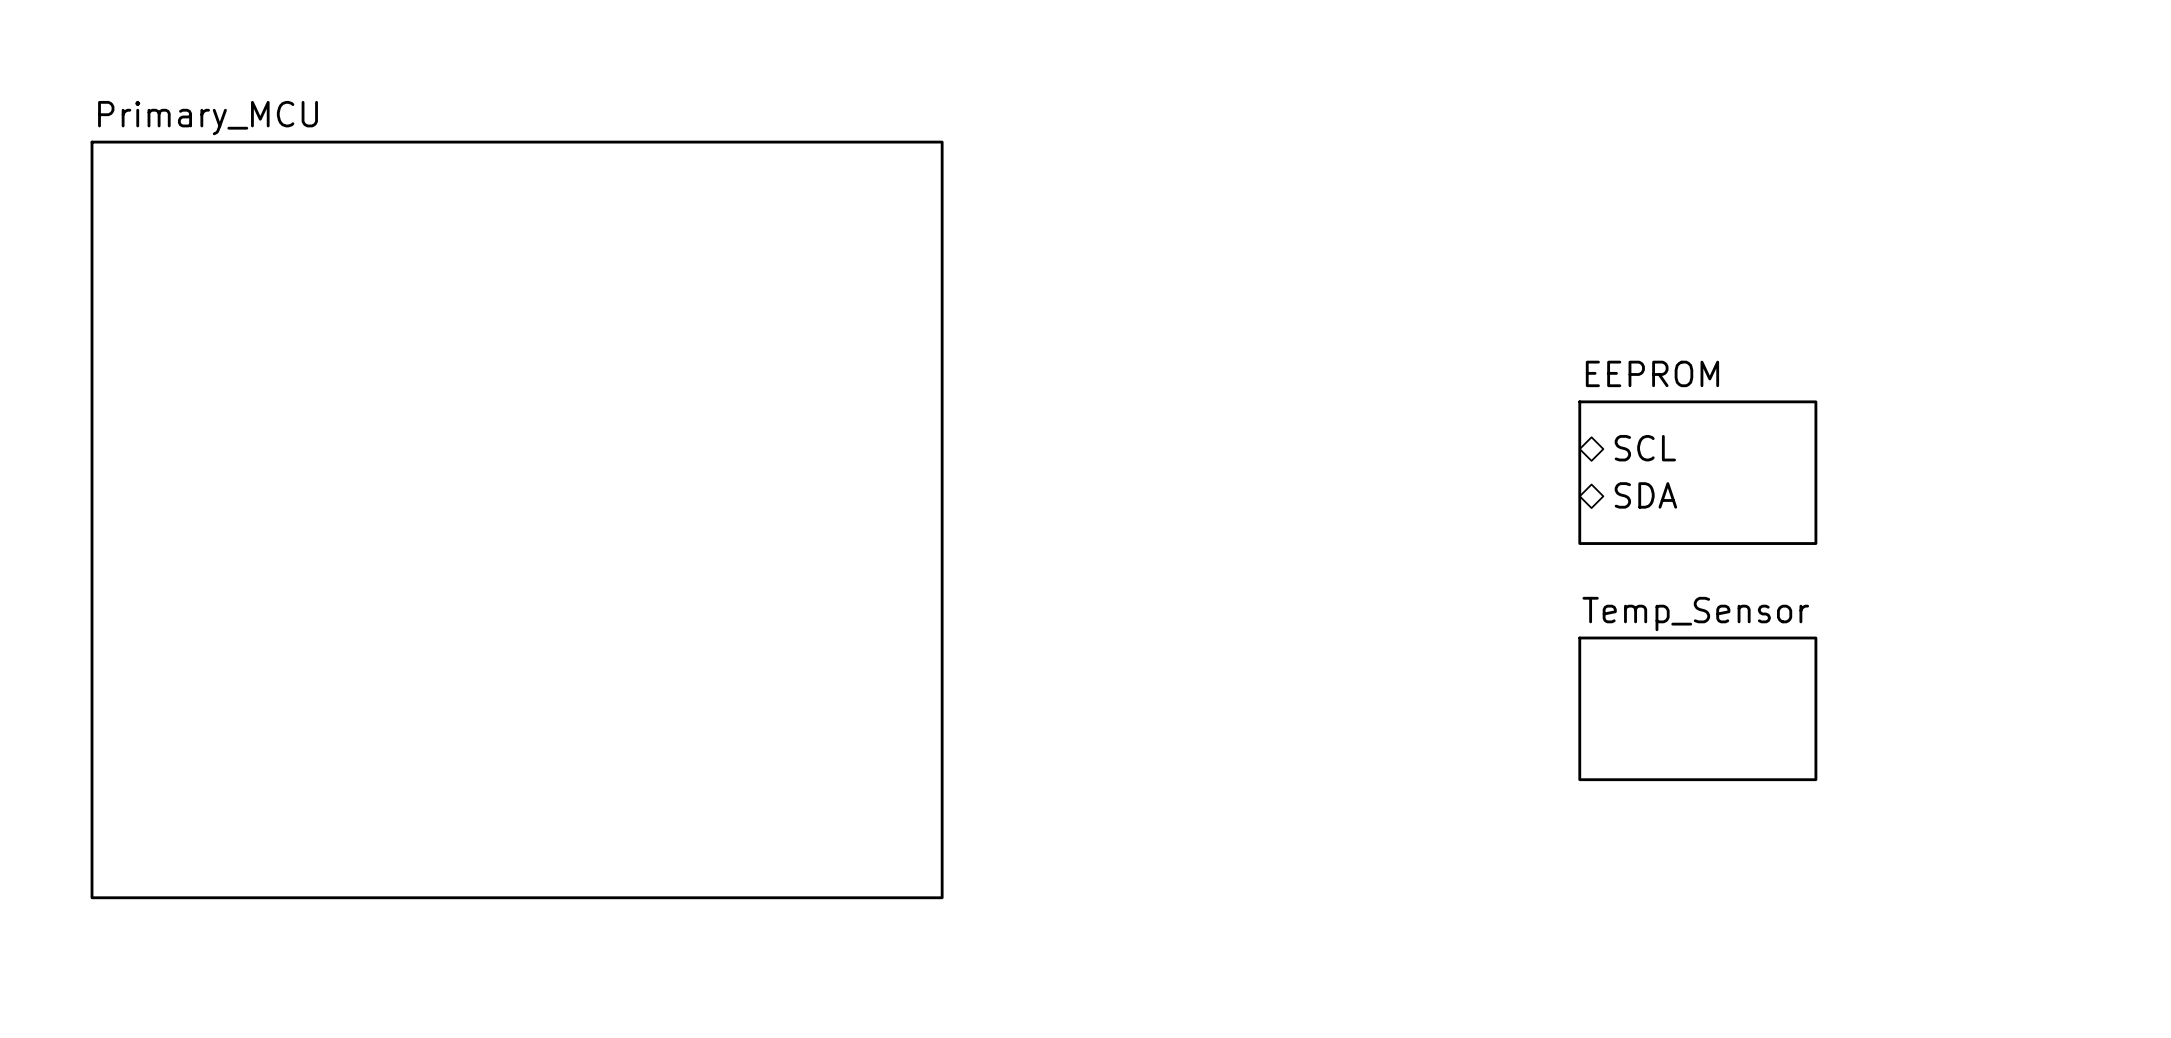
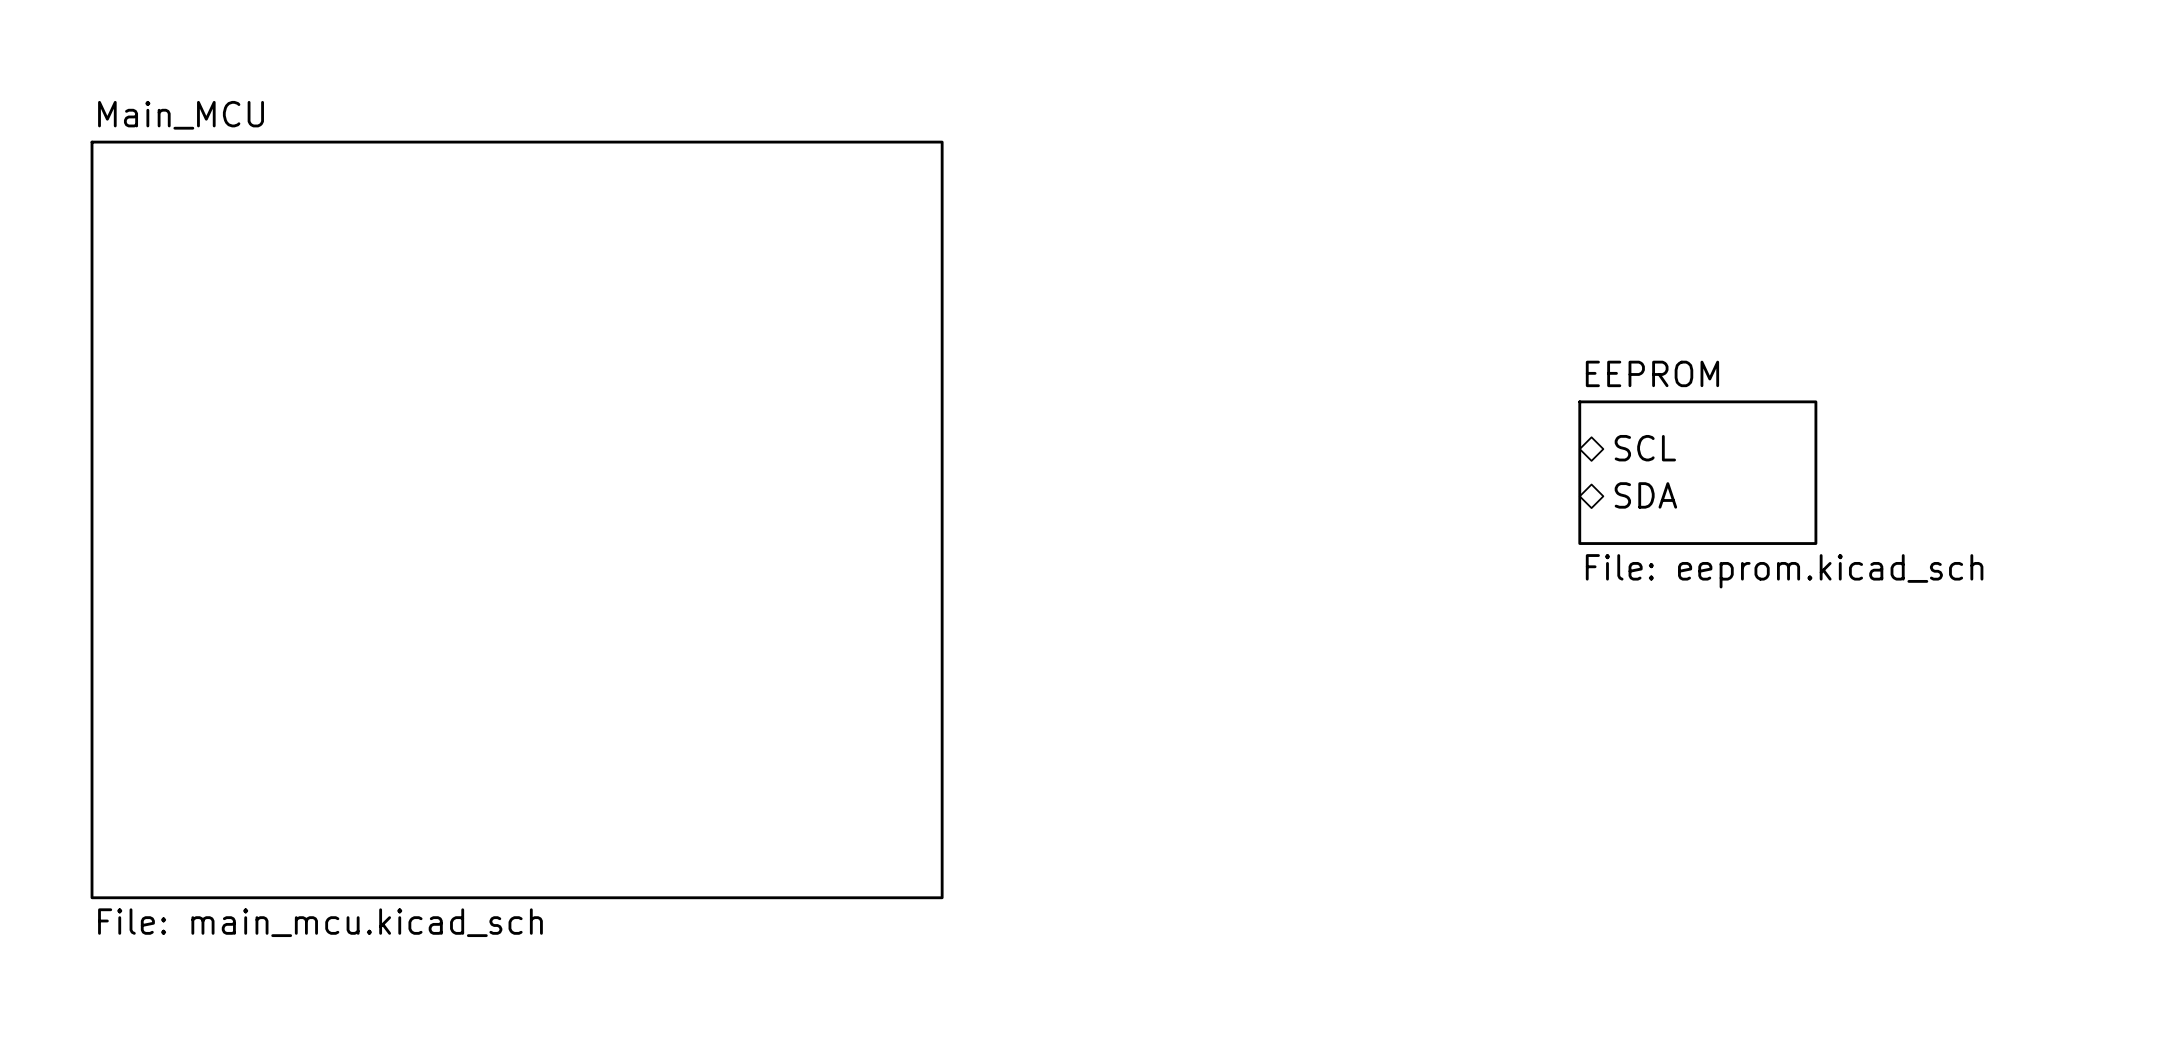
sheet Primary_MCU name: Primary_MCU (208, 118) -> Main_MCU (181, 115)
sheet EEPROM value: none -> File: eeprom.kicad_sch (1784, 571)
sheet Temp_Sensor: (1697, 708) -> none
sheet Primary_MCU value: none -> File: main_mcu.kicad_sch (320, 922)

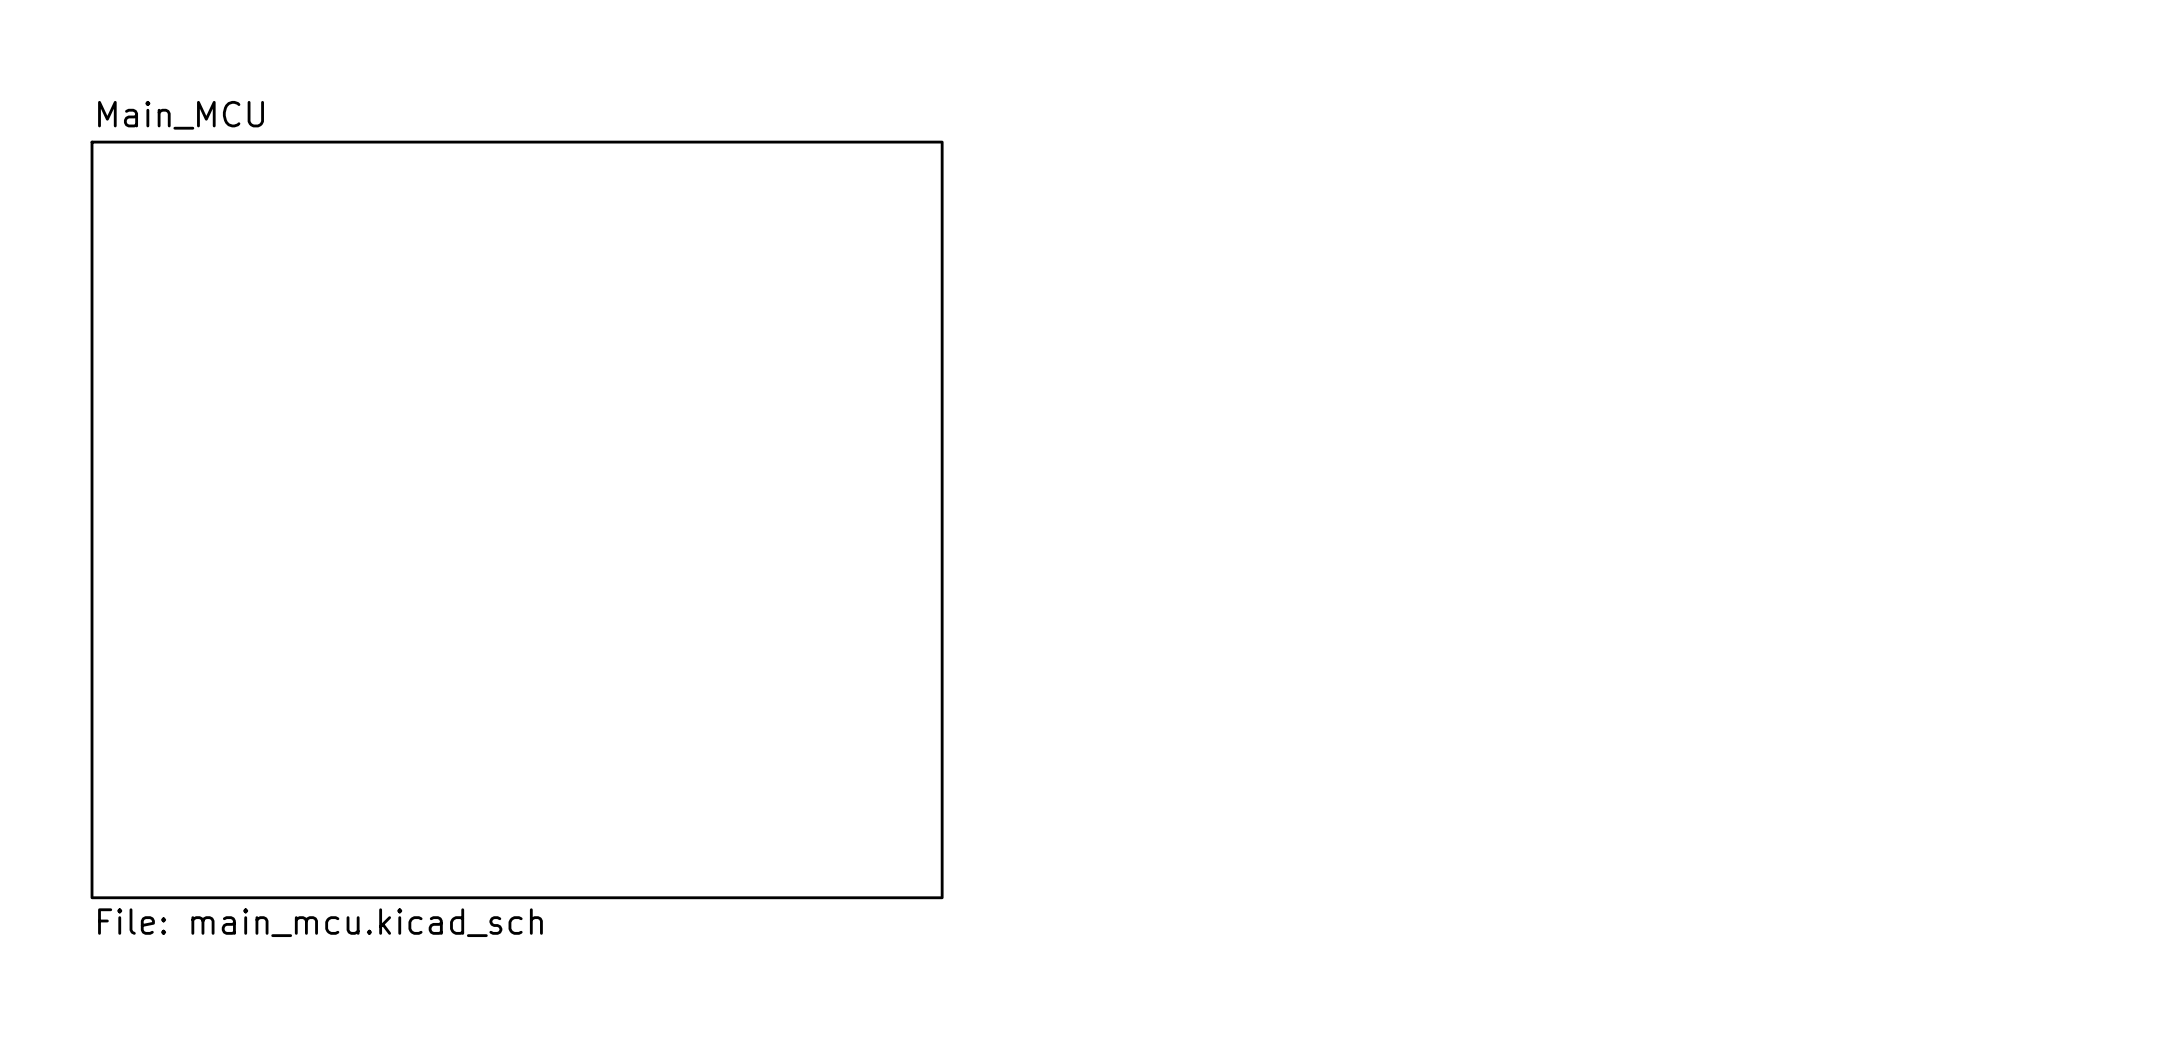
sheet pin: SCL (1645, 448) -> none
sheet EEPROM: File: eeprom.kicad_sch (1697, 472) -> none
sheet pin: SDA (1645, 495) -> none

